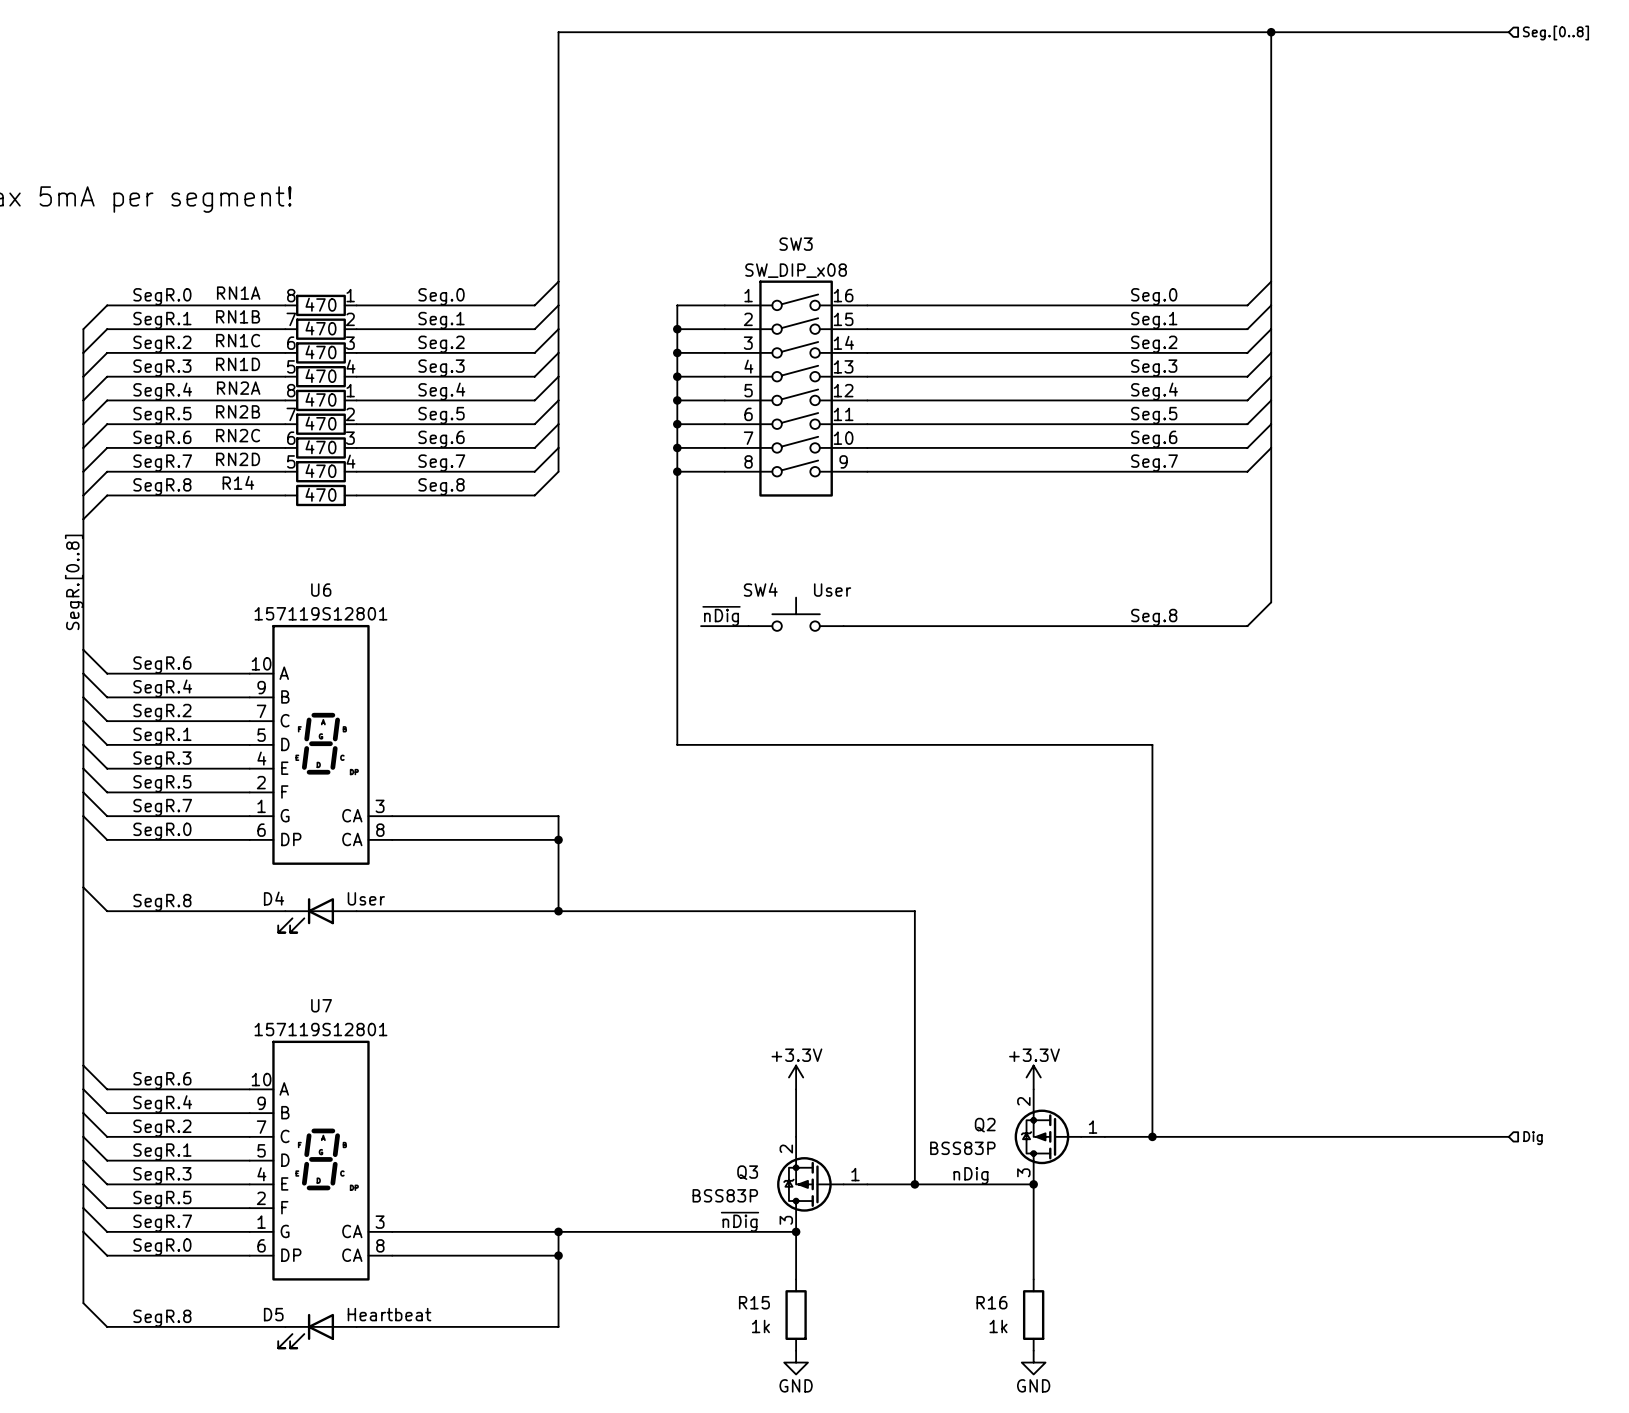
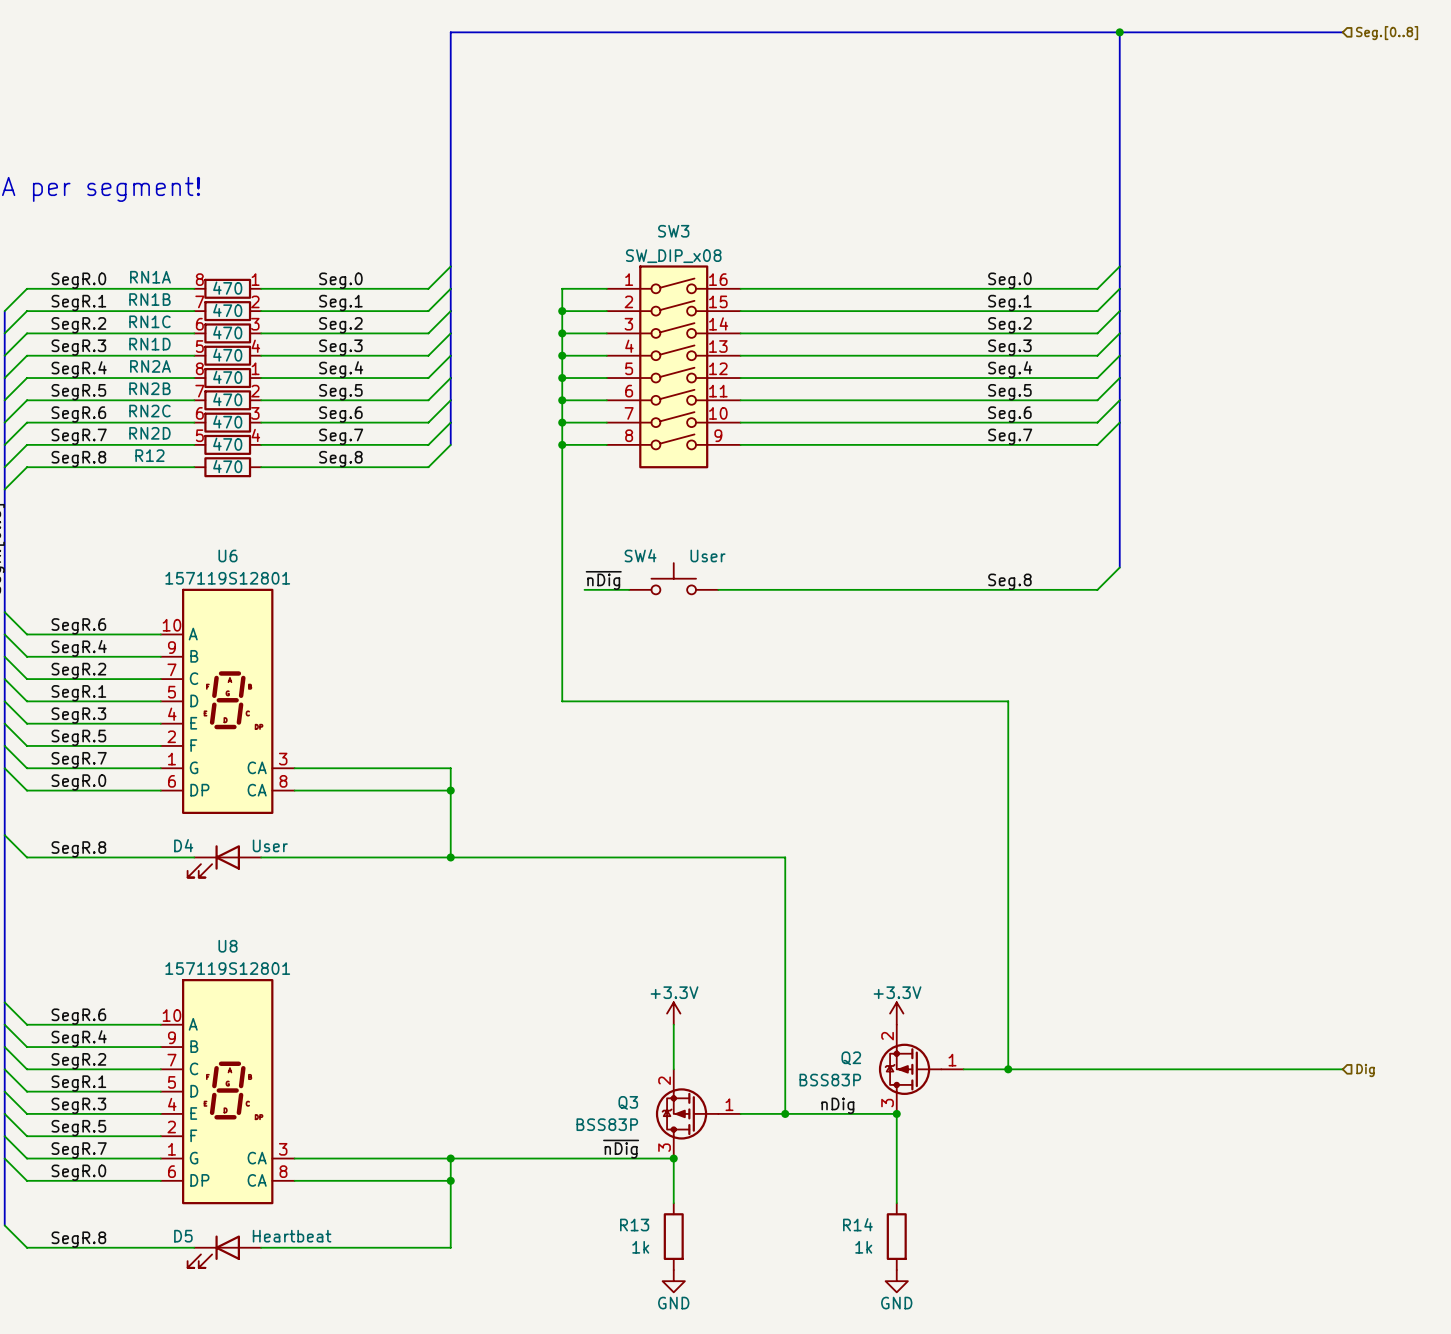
R14 name: R14 (238, 482) -> R12 (149, 455)
U7 name: U7 (321, 1005) -> U8 (227, 946)
R15 name: R15 (754, 1302) -> R13 (634, 1225)
R16 name: R16 (991, 1302) -> R14 (857, 1224)

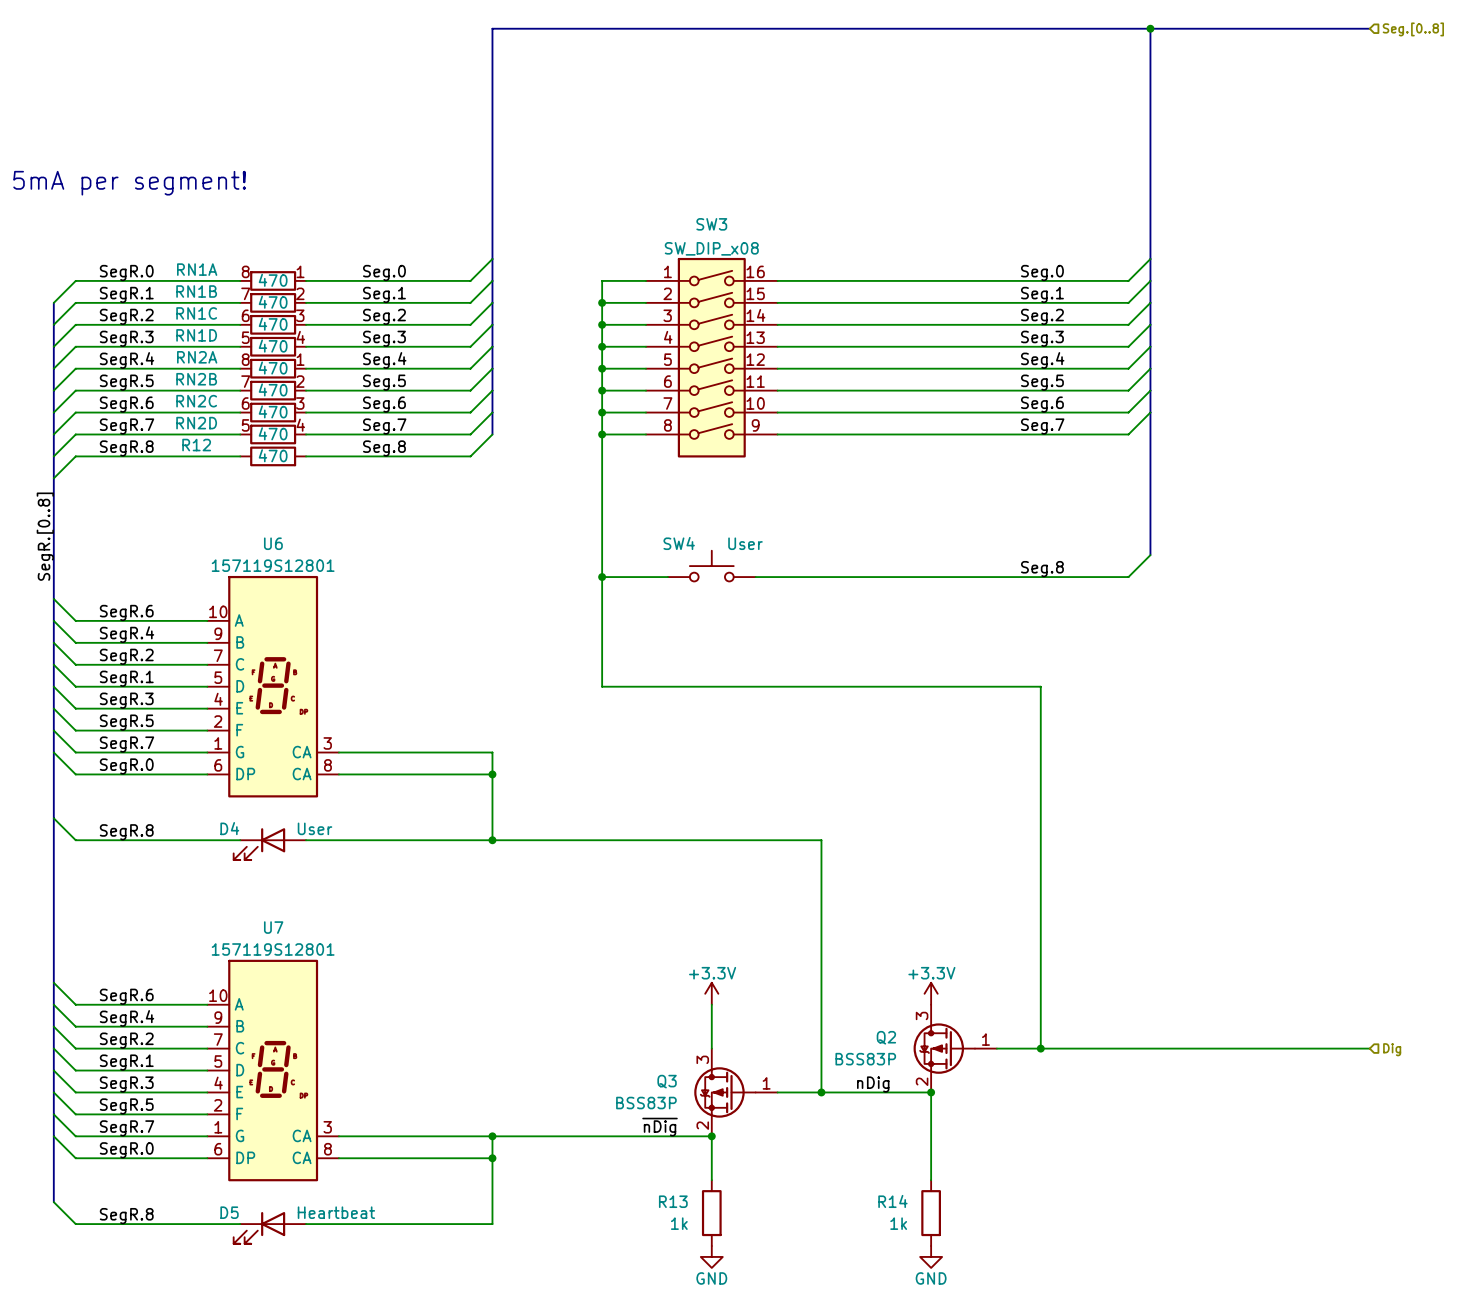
label: ~{nDig} (603, 580) -> none
wire: none -> (602, 577) (624, 577)
junction: none -> (602, 577)
U8 name: U8 (227, 946) -> U7 (273, 927)
Q2 flip: as is (910, 1069) -> up-down (944, 1048)
Q3 flip: as is (687, 1113) -> up-down (724, 1092)

